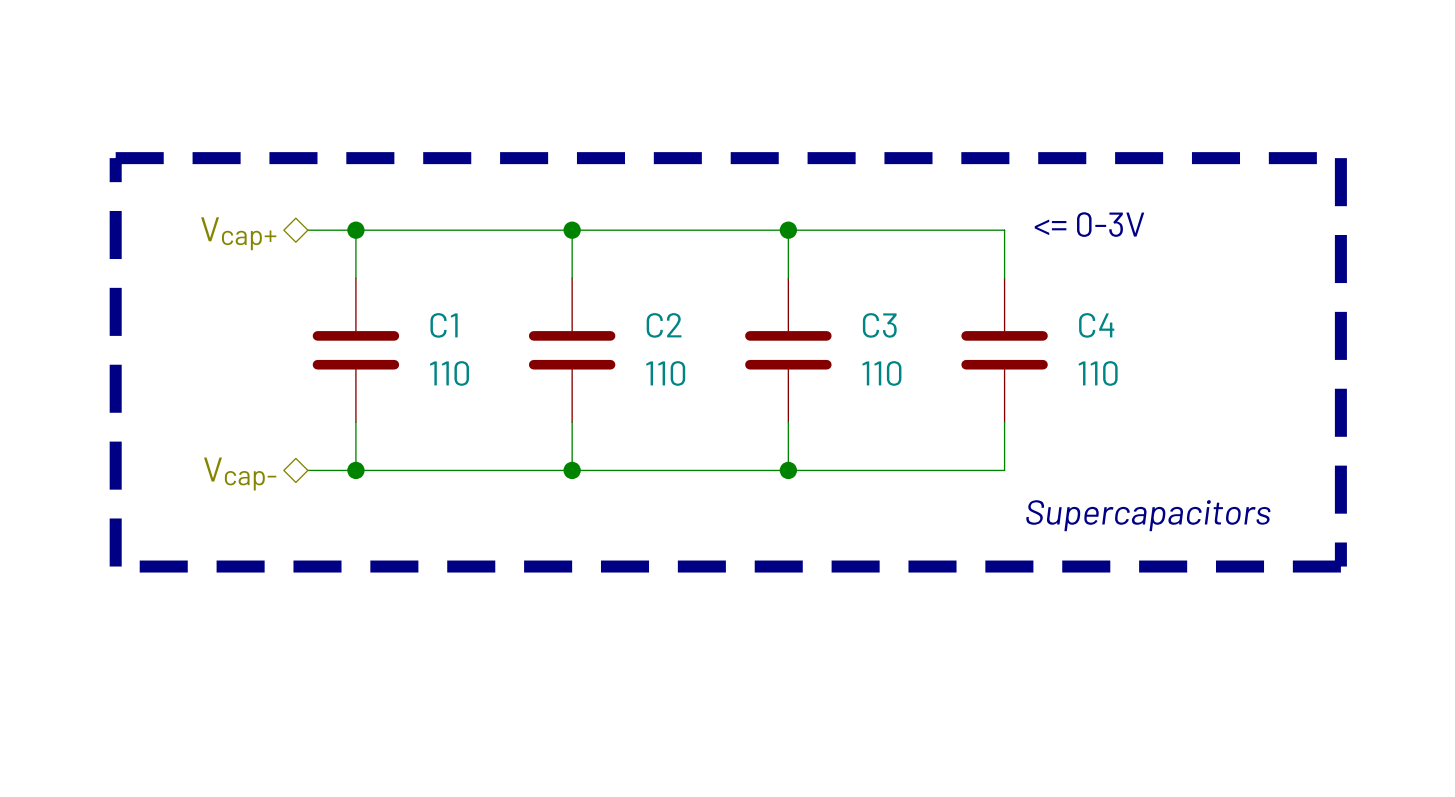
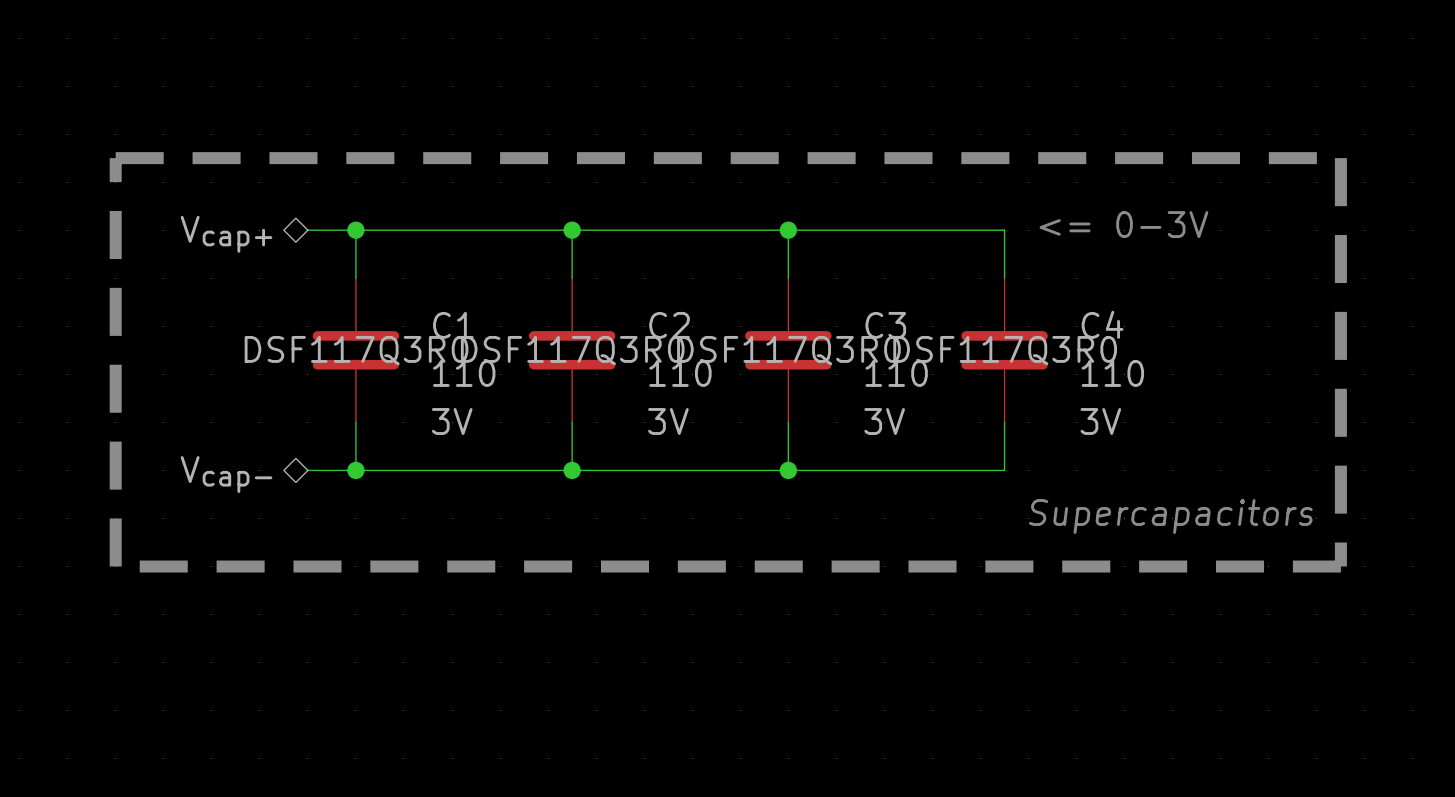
C1 text: none -> DSF117Q3R0 (356, 350)
C2 text: none -> DSF117Q3R0 (572, 350)
C3 text: none -> DSF117Q3R0 (788, 350)
C4 text: none -> DSF117Q3R0 (1005, 350)
C1 text: none -> 3V (452, 421)
C2 text: none -> 3V (668, 421)
C3 text: none -> 3V (884, 421)
C4 text: none -> 3V (1100, 421)

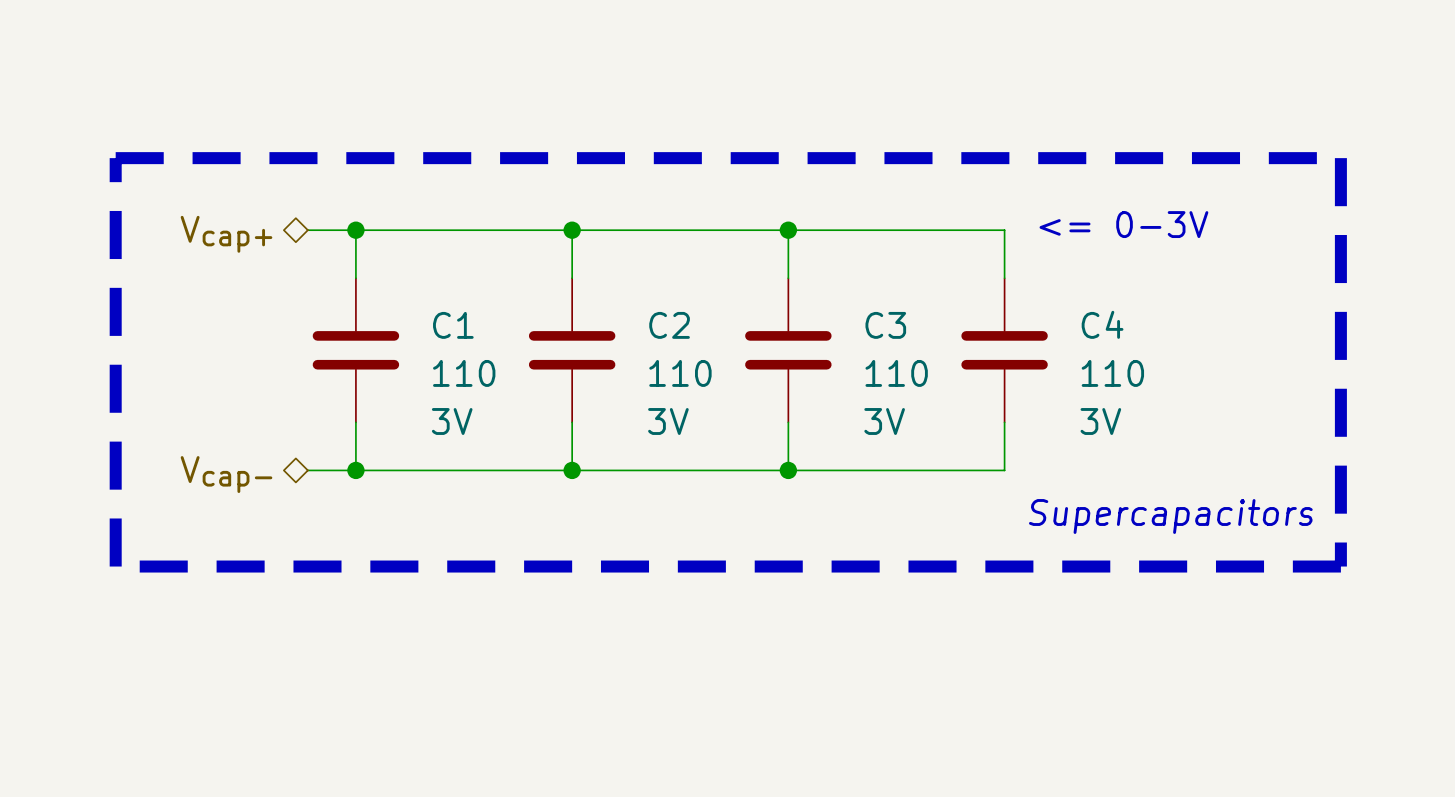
C1 text: DSF117Q3R0 (356, 350) -> none
C2 text: DSF117Q3R0 (572, 350) -> none
C3 text: DSF117Q3R0 (788, 350) -> none
C4 text: DSF117Q3R0 (1005, 350) -> none

